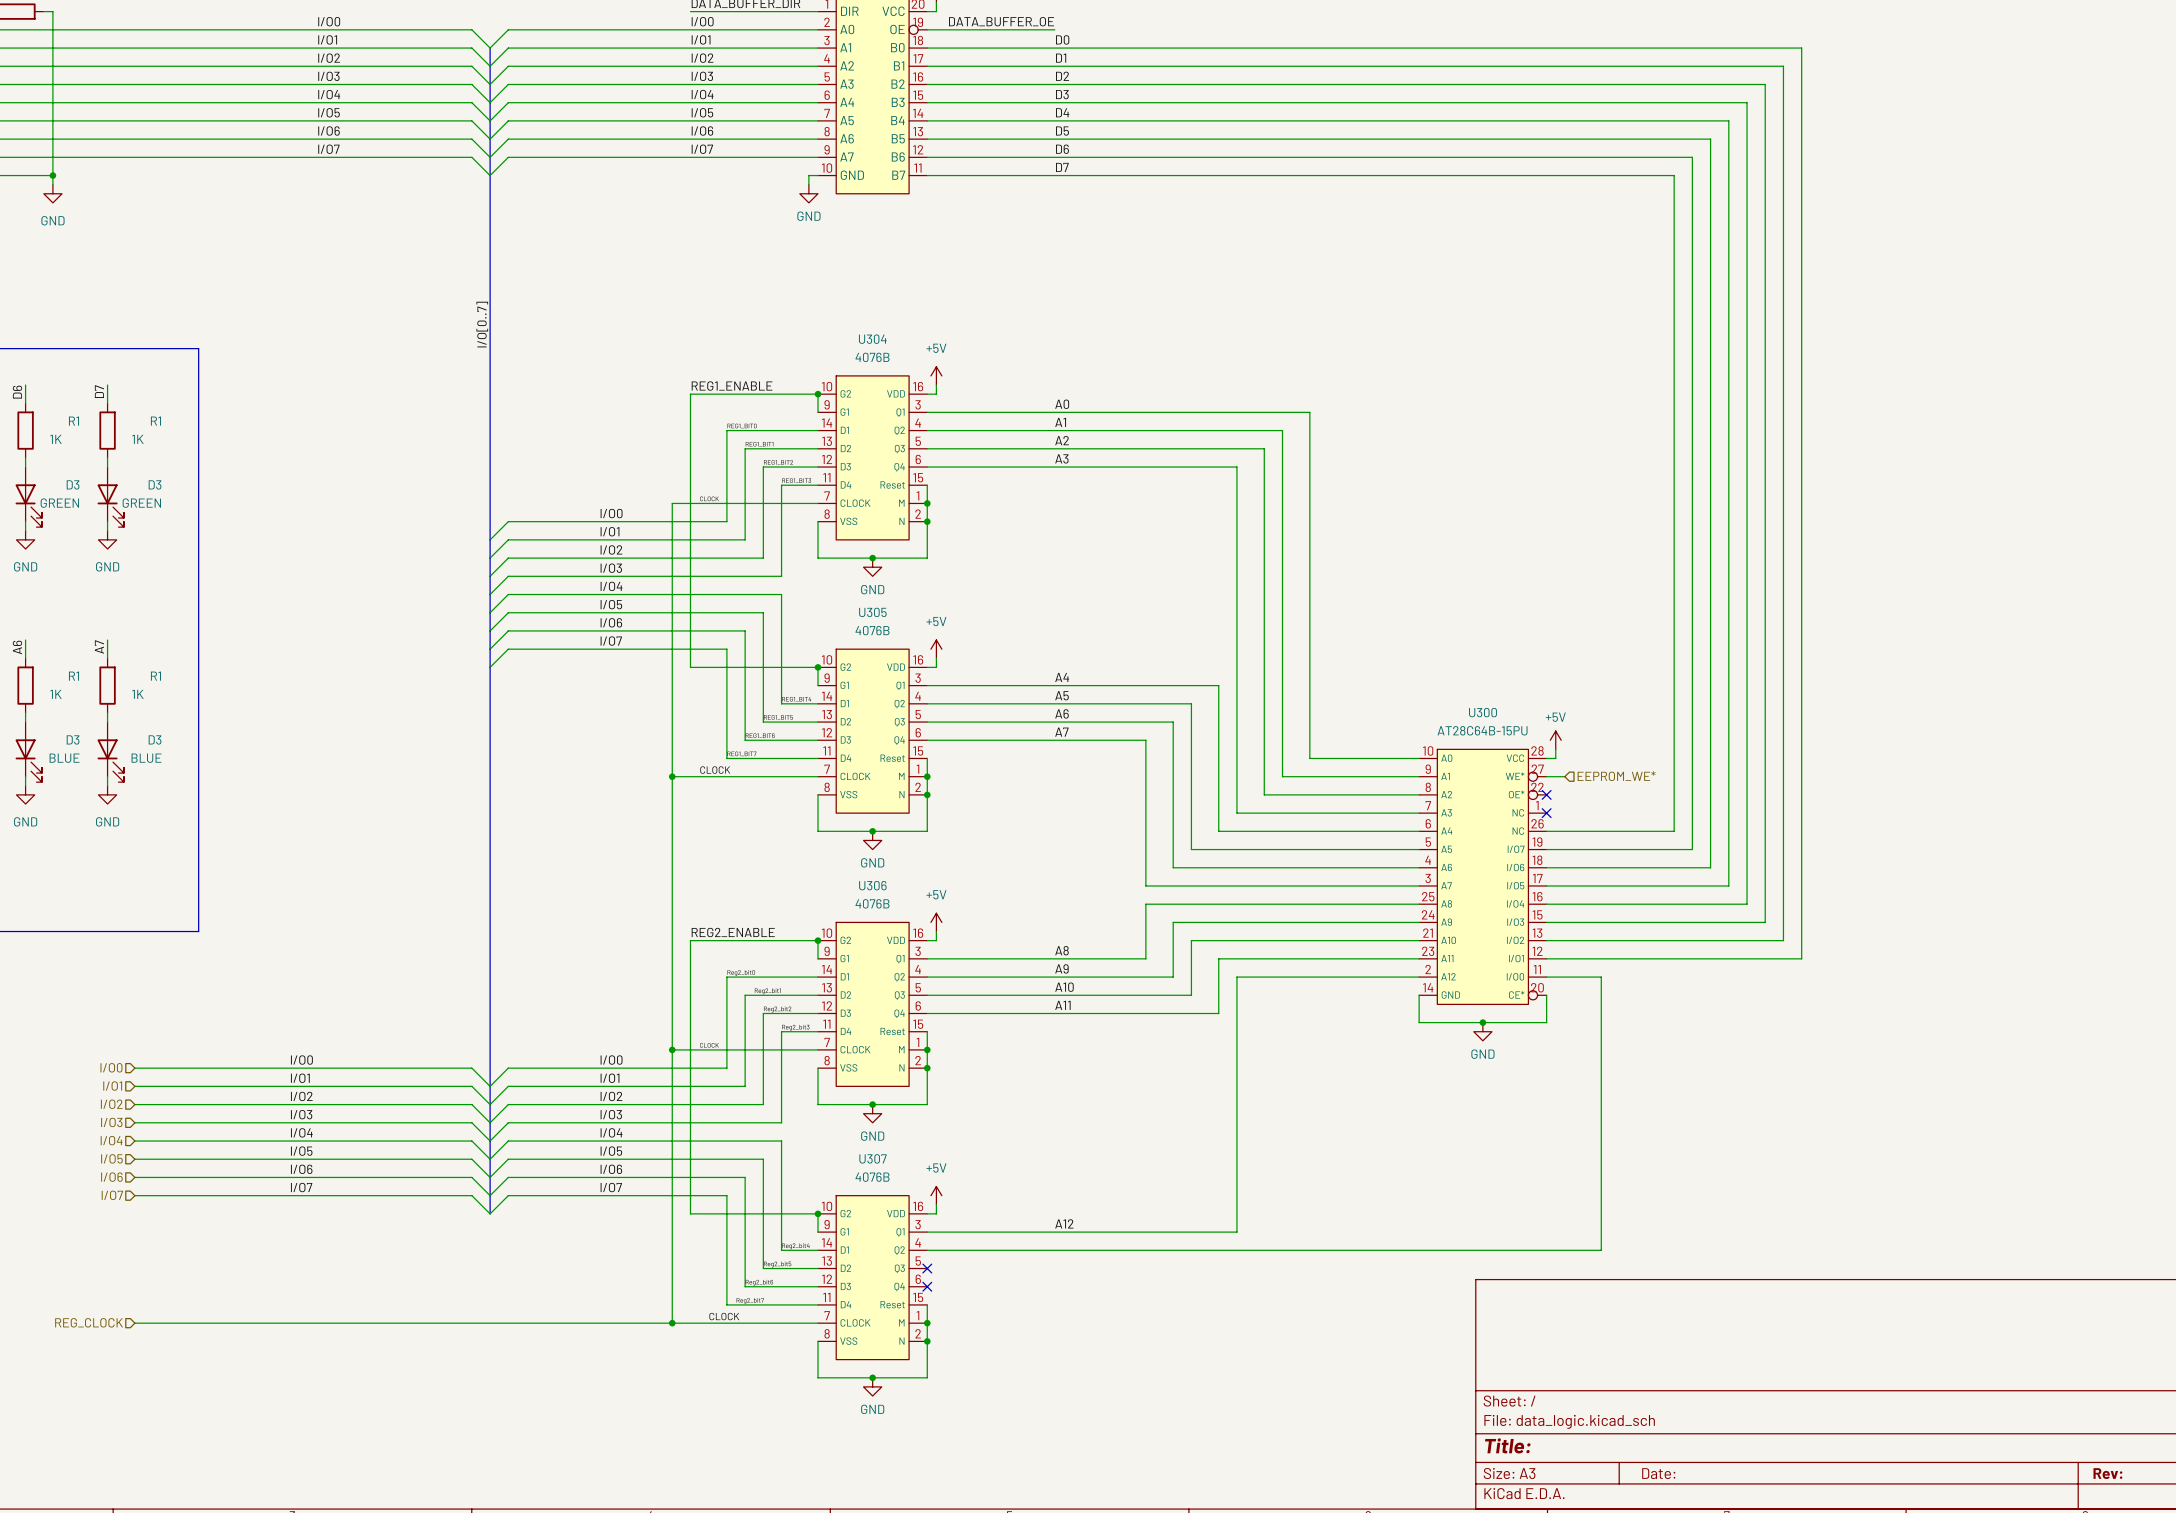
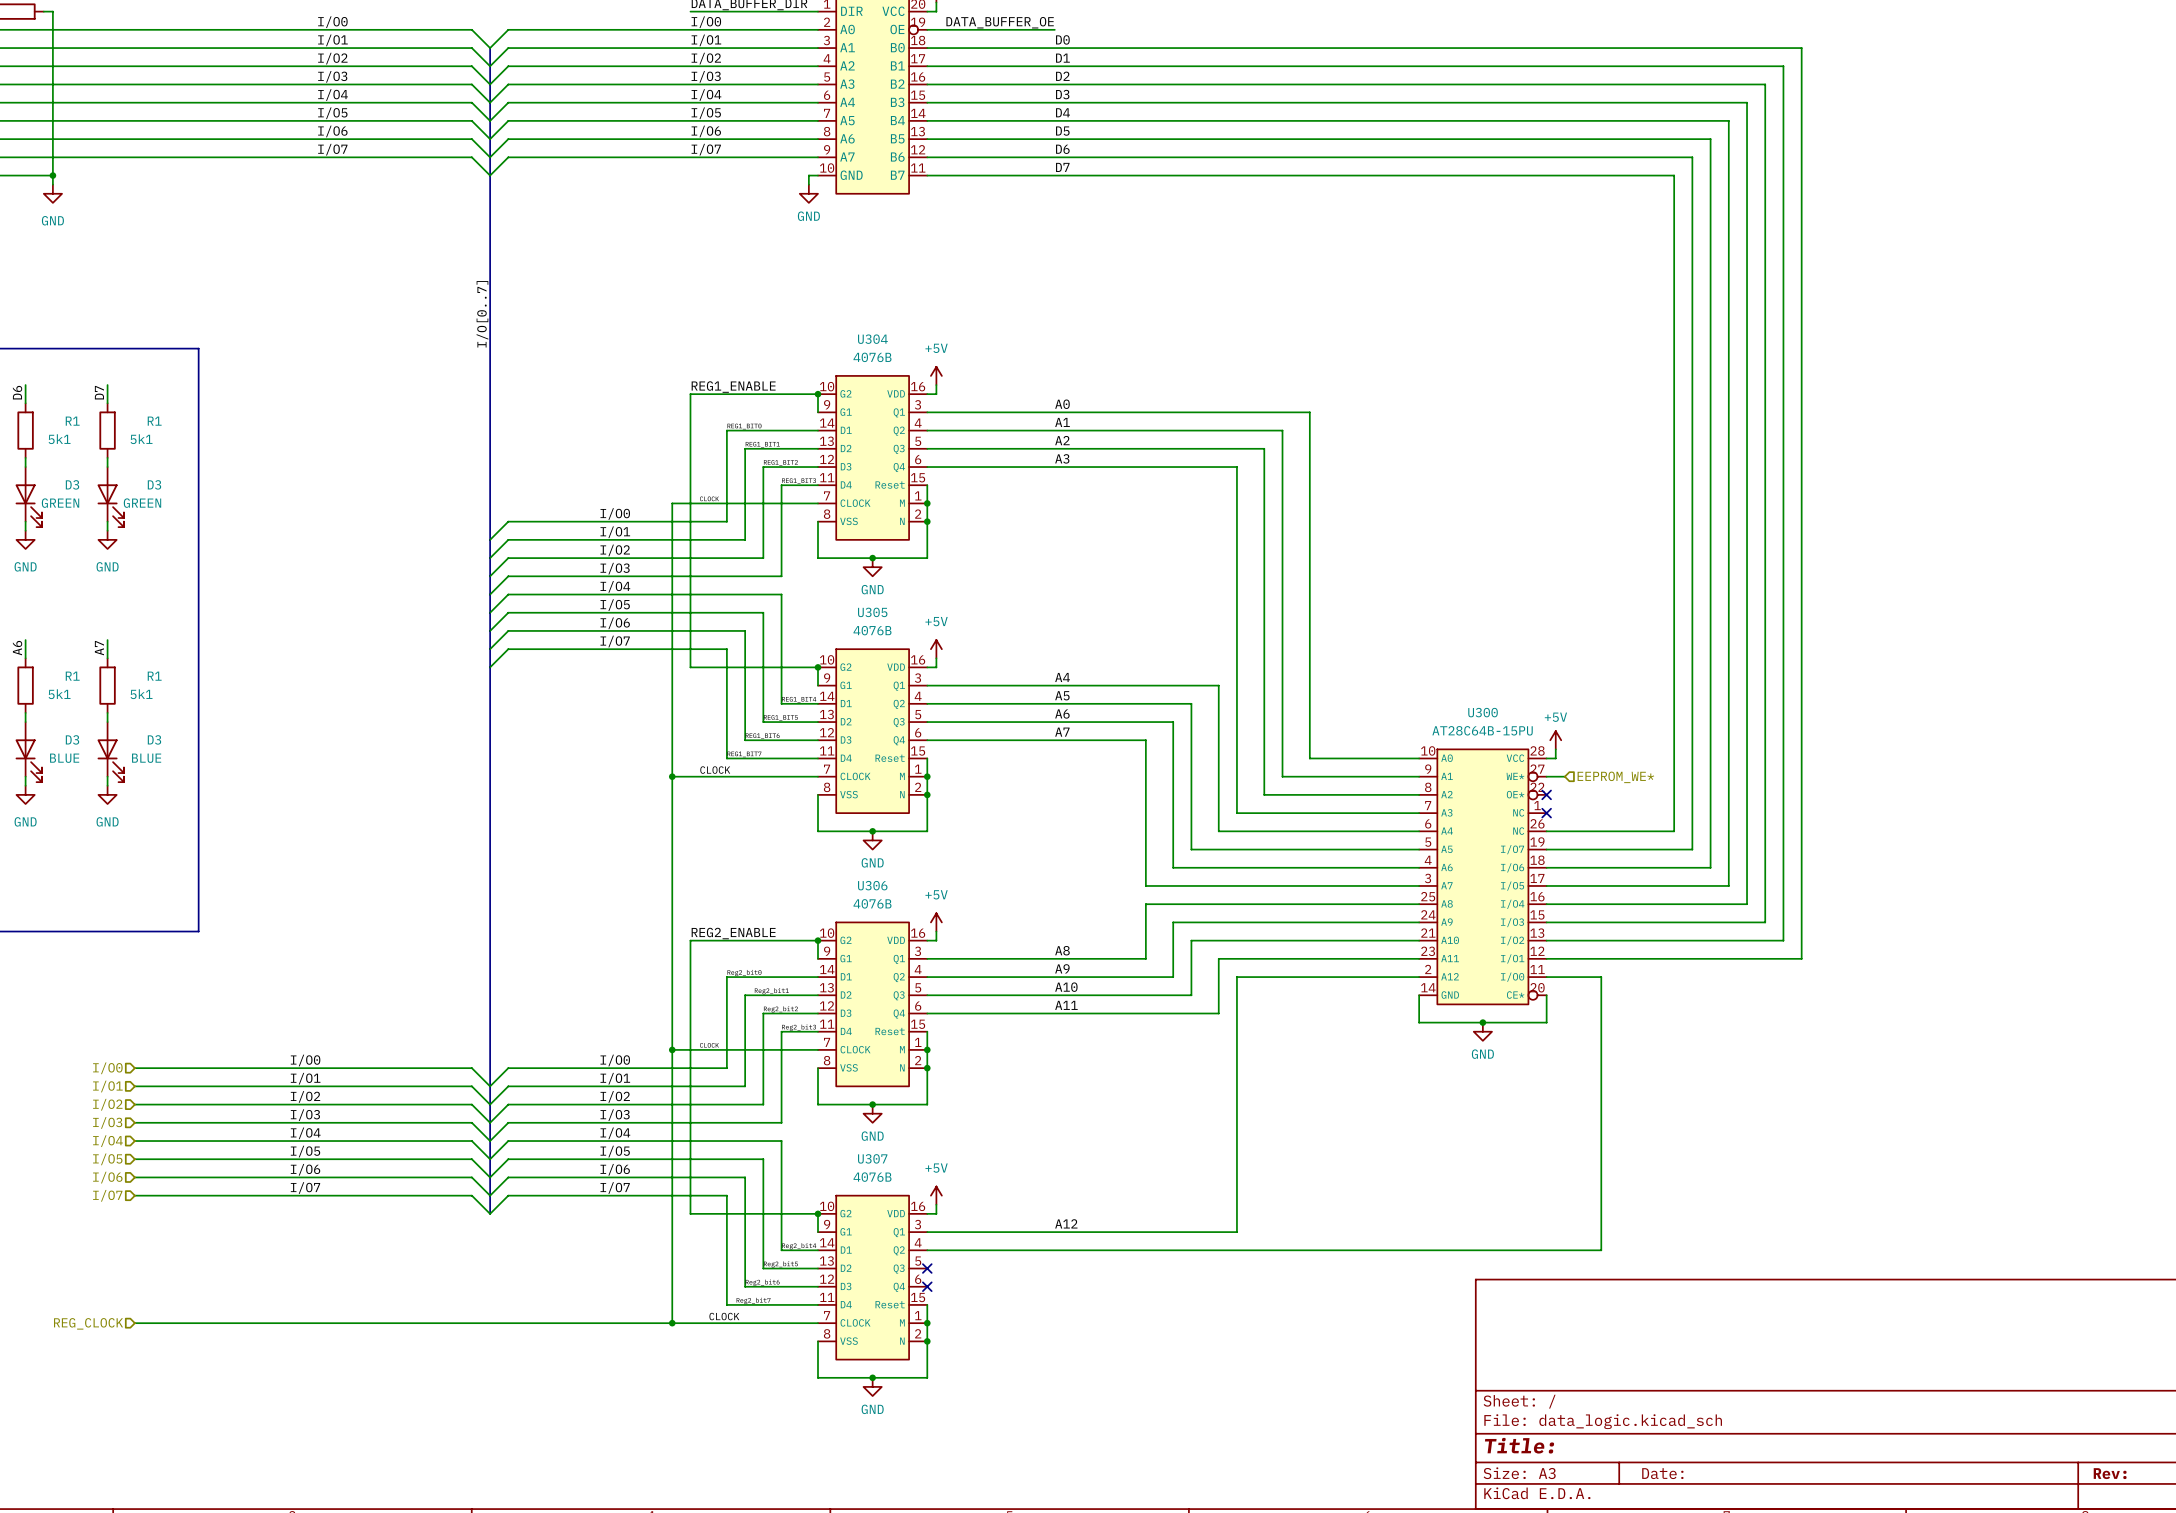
R1 value: 1K (55, 439) -> 5k1 (59, 439)
R1 value: 1K (137, 439) -> 5k1 (141, 439)
R1 value: 1K (55, 694) -> 5k1 (59, 694)
R1 value: 1K (137, 694) -> 5k1 (141, 694)

